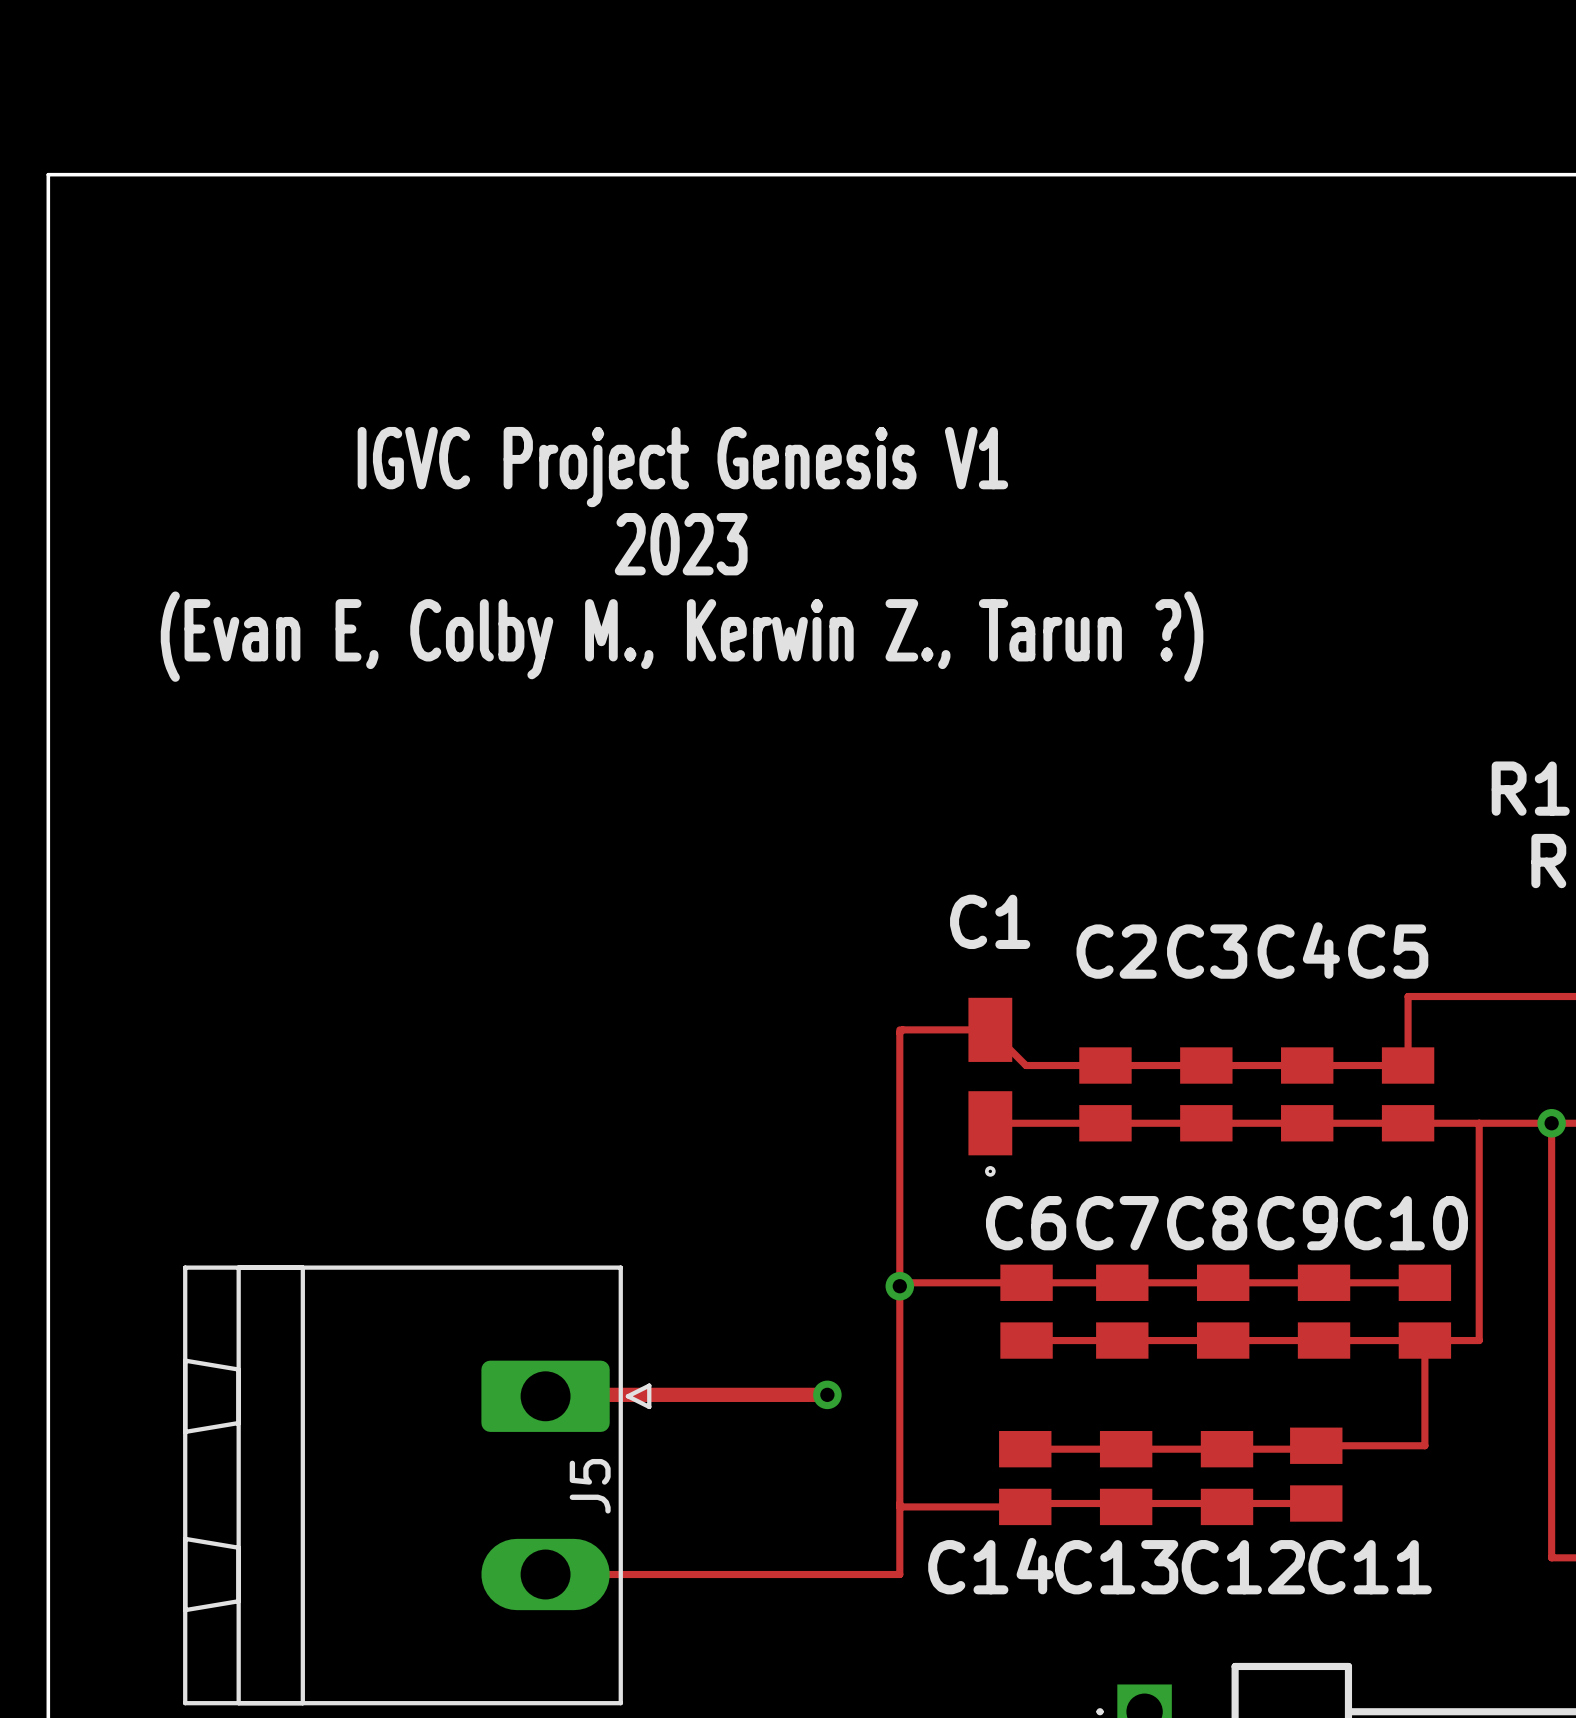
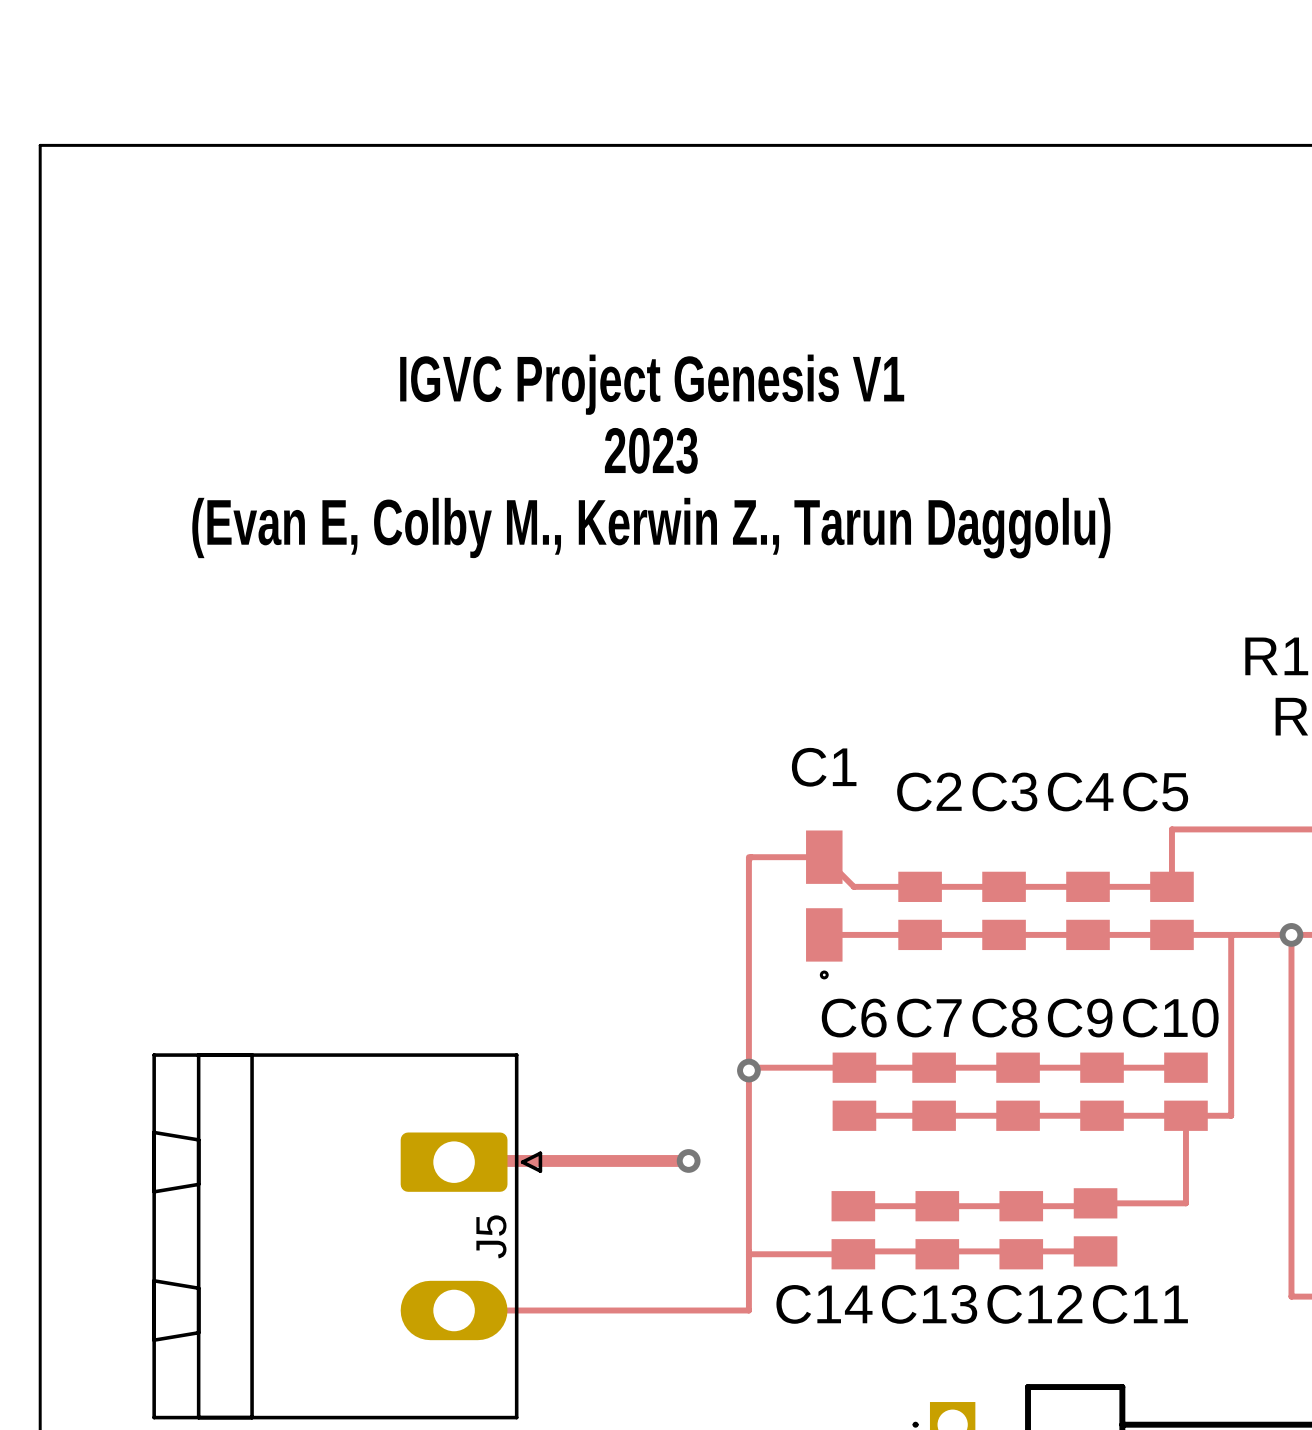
text position: IGVC Project Genesis V1 (682, 467) -> IGVC Project Genesis V1 (652, 384)
text position: 2023 (681, 544) -> 2023 (651, 450)
text: (Evan E, Colby M., Kerwin Z., Tarun ?) (682, 636) -> (Evan E, Colby M., Kerwin Z., Tarun Daggolu) (651, 528)

